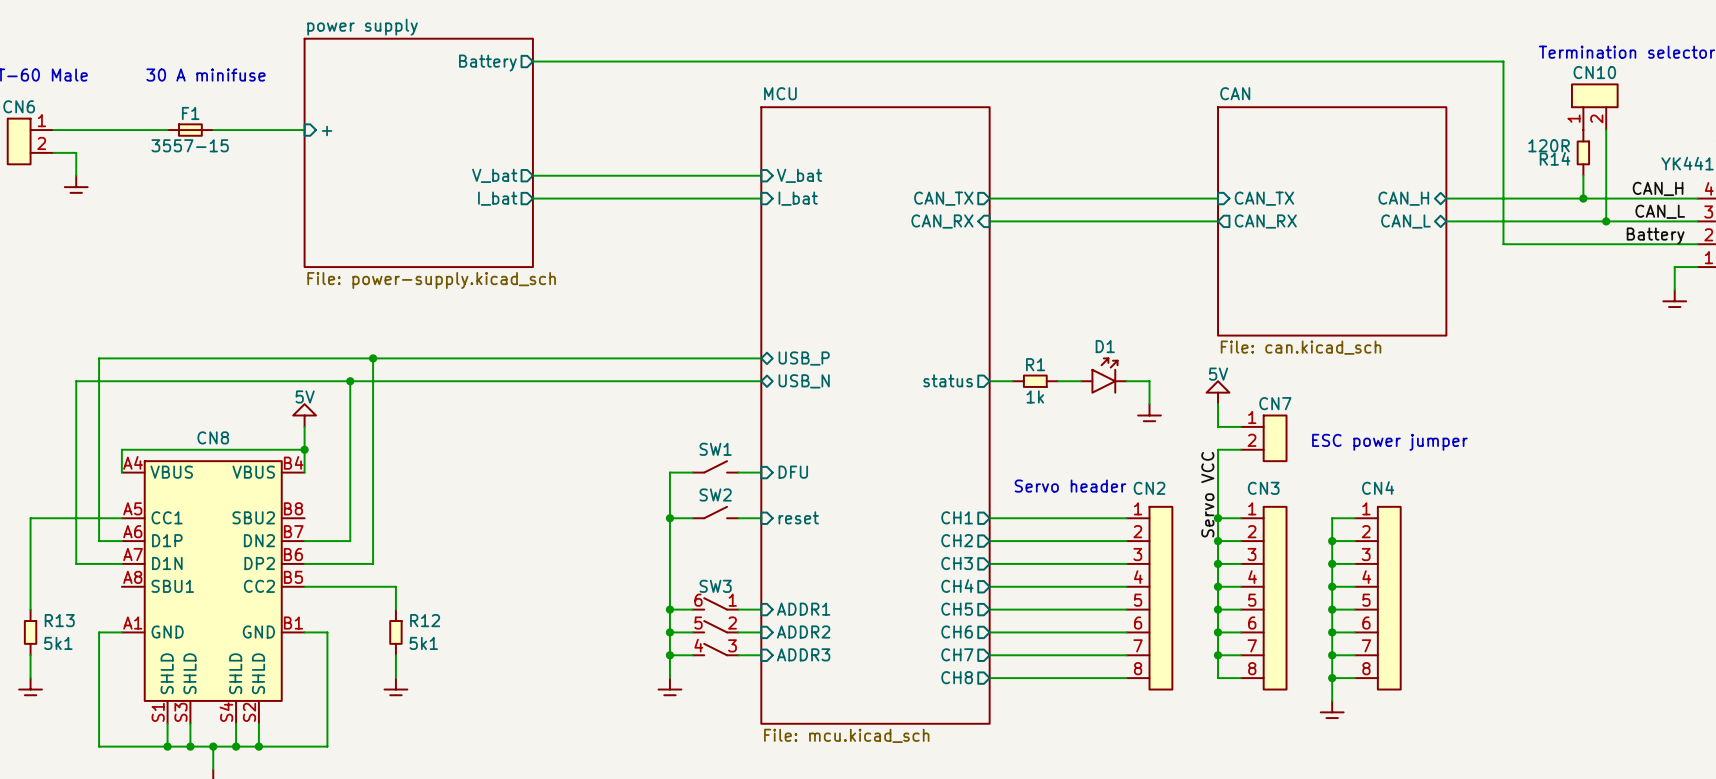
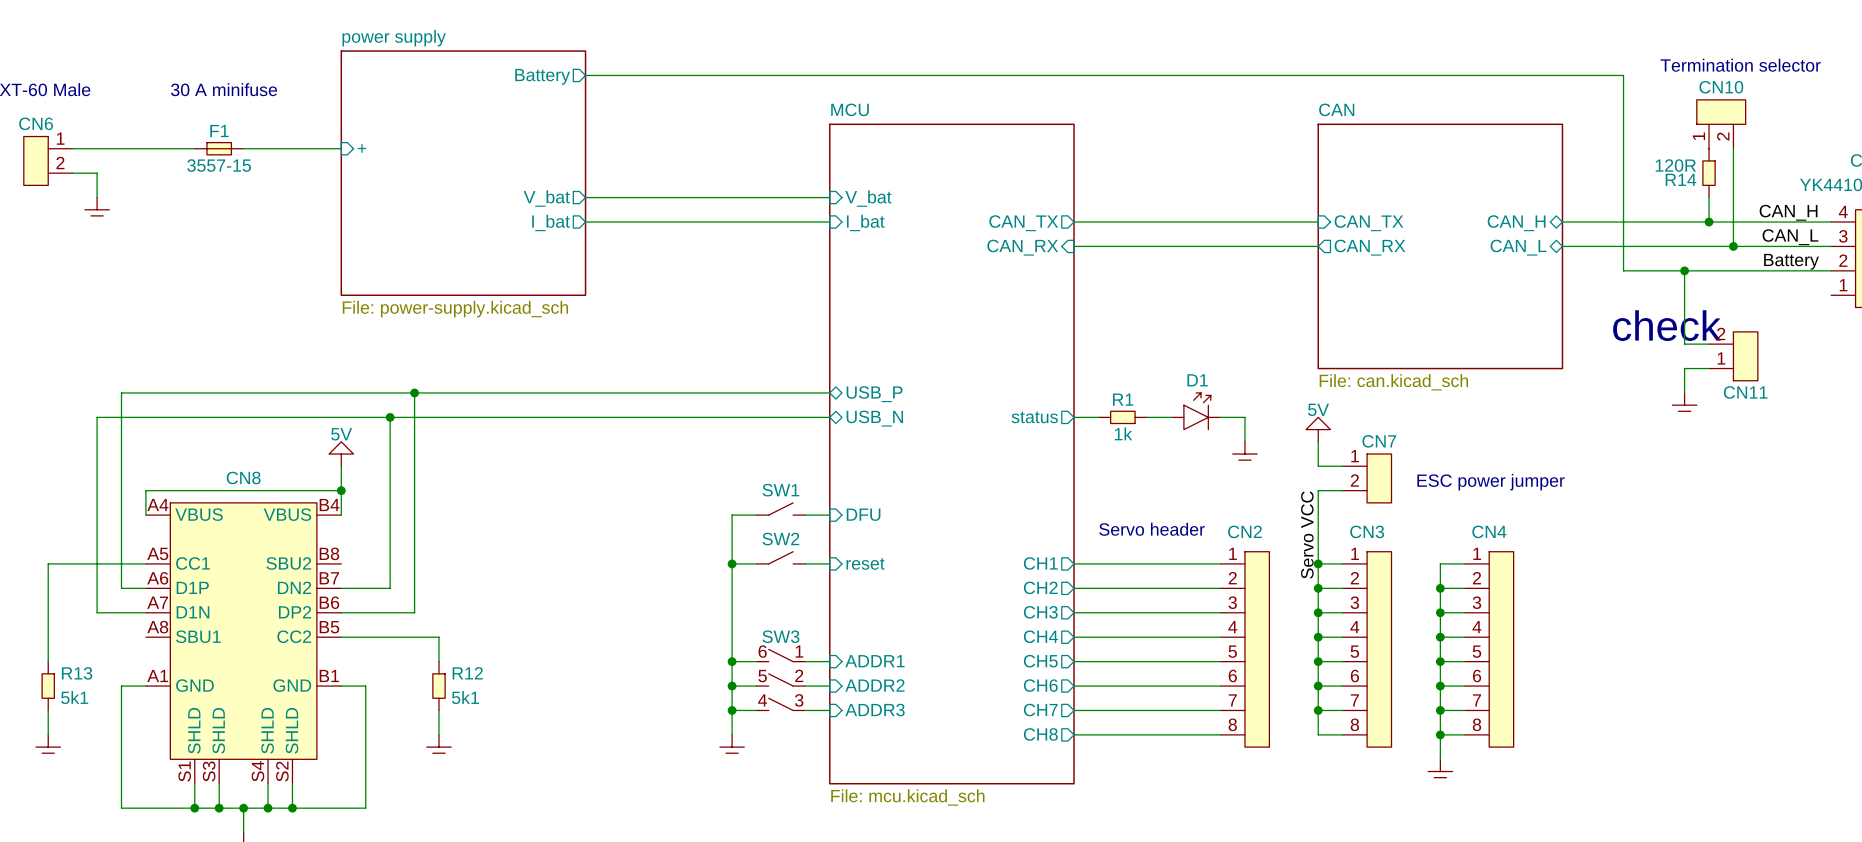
wire: none -> (1684, 270) (1684, 344) (1709, 344)
junction: none -> (1684, 270)
wire: (1697, 267) (1674, 267) (1674, 289) -> (1709, 368) (1684, 368) (1684, 392)
text: none -> check (1667, 325)
power symbol: (1674, 301) -> none
CN11: none -> (1733, 356)
power symbol: none -> (1684, 405)

